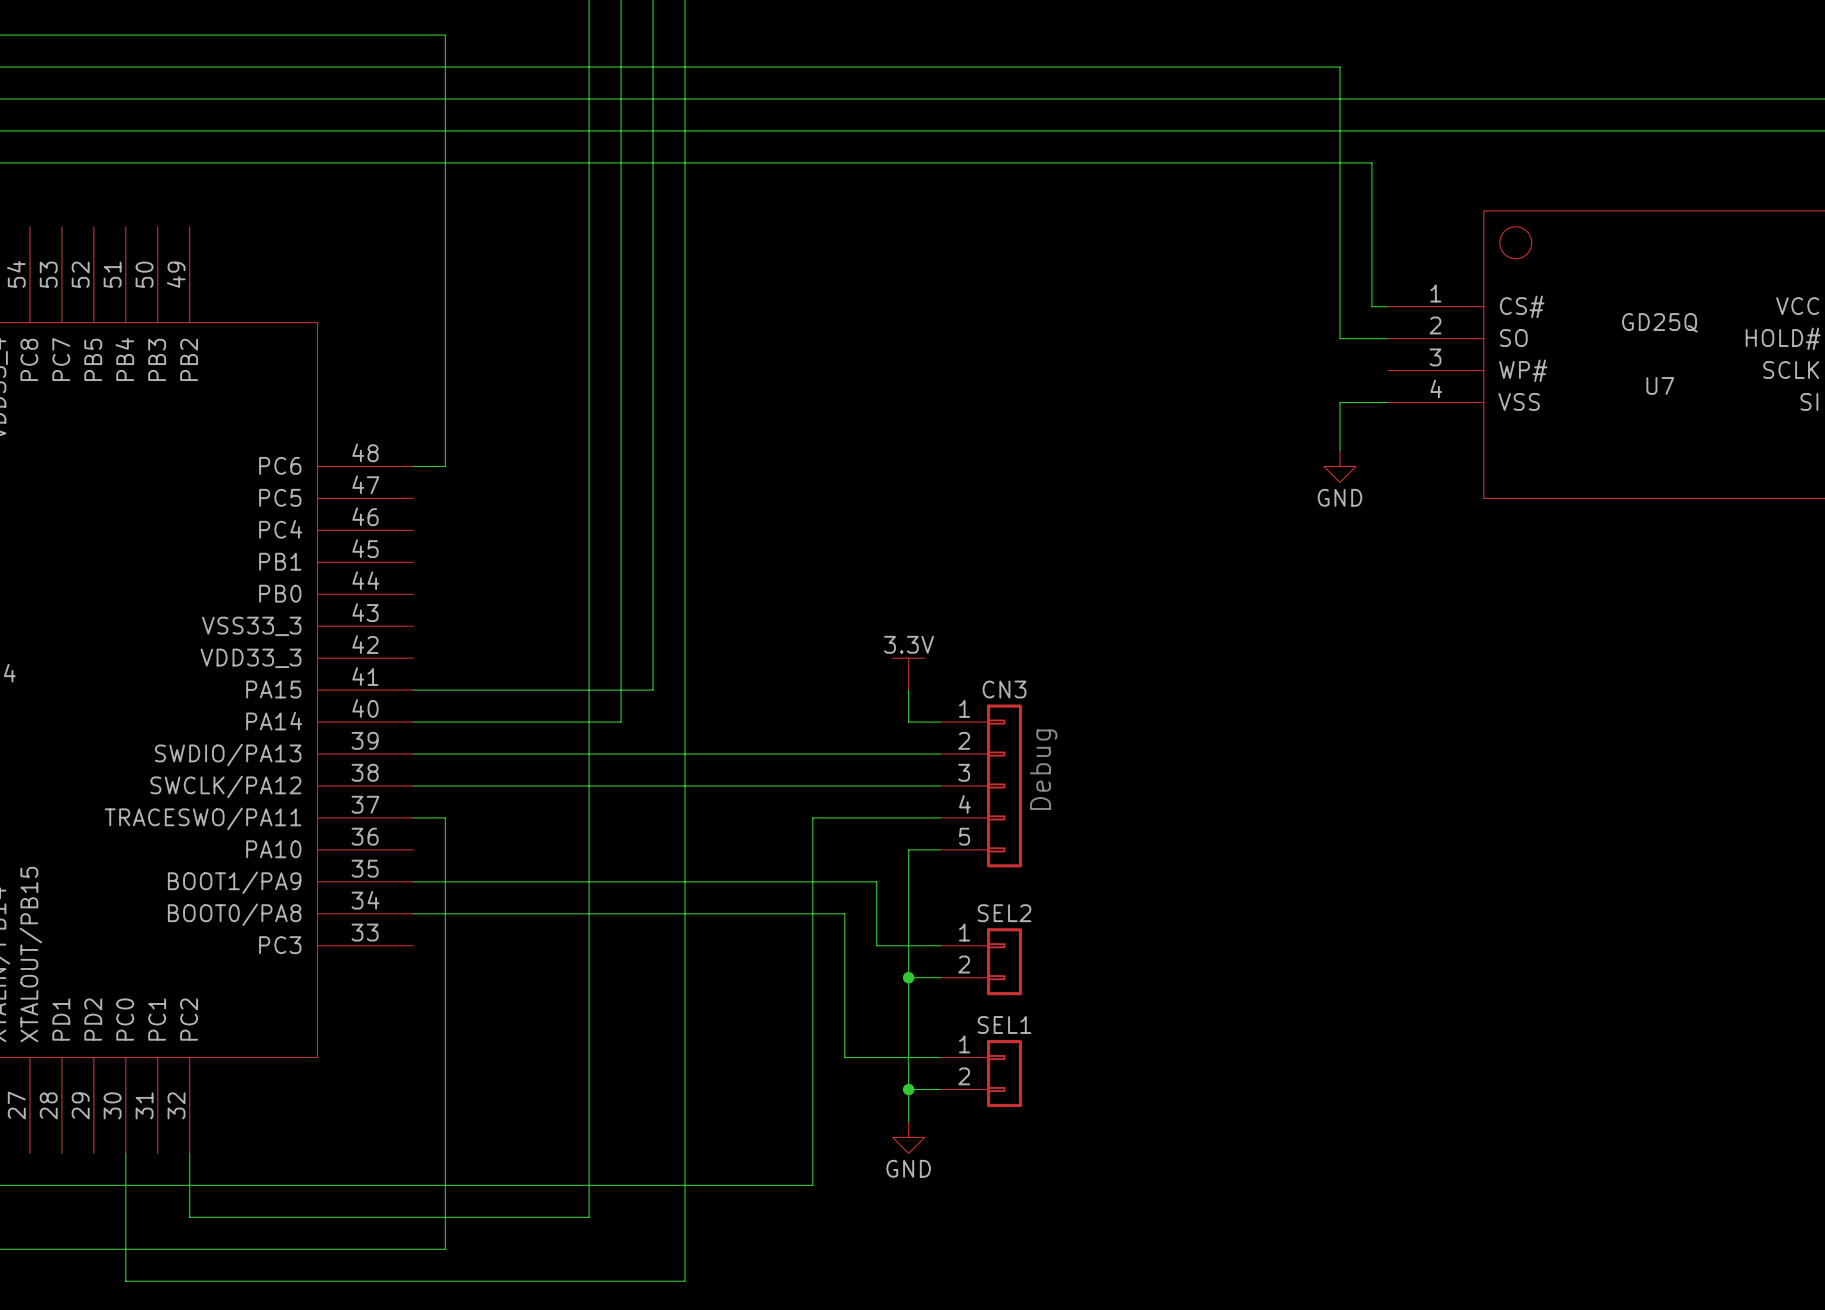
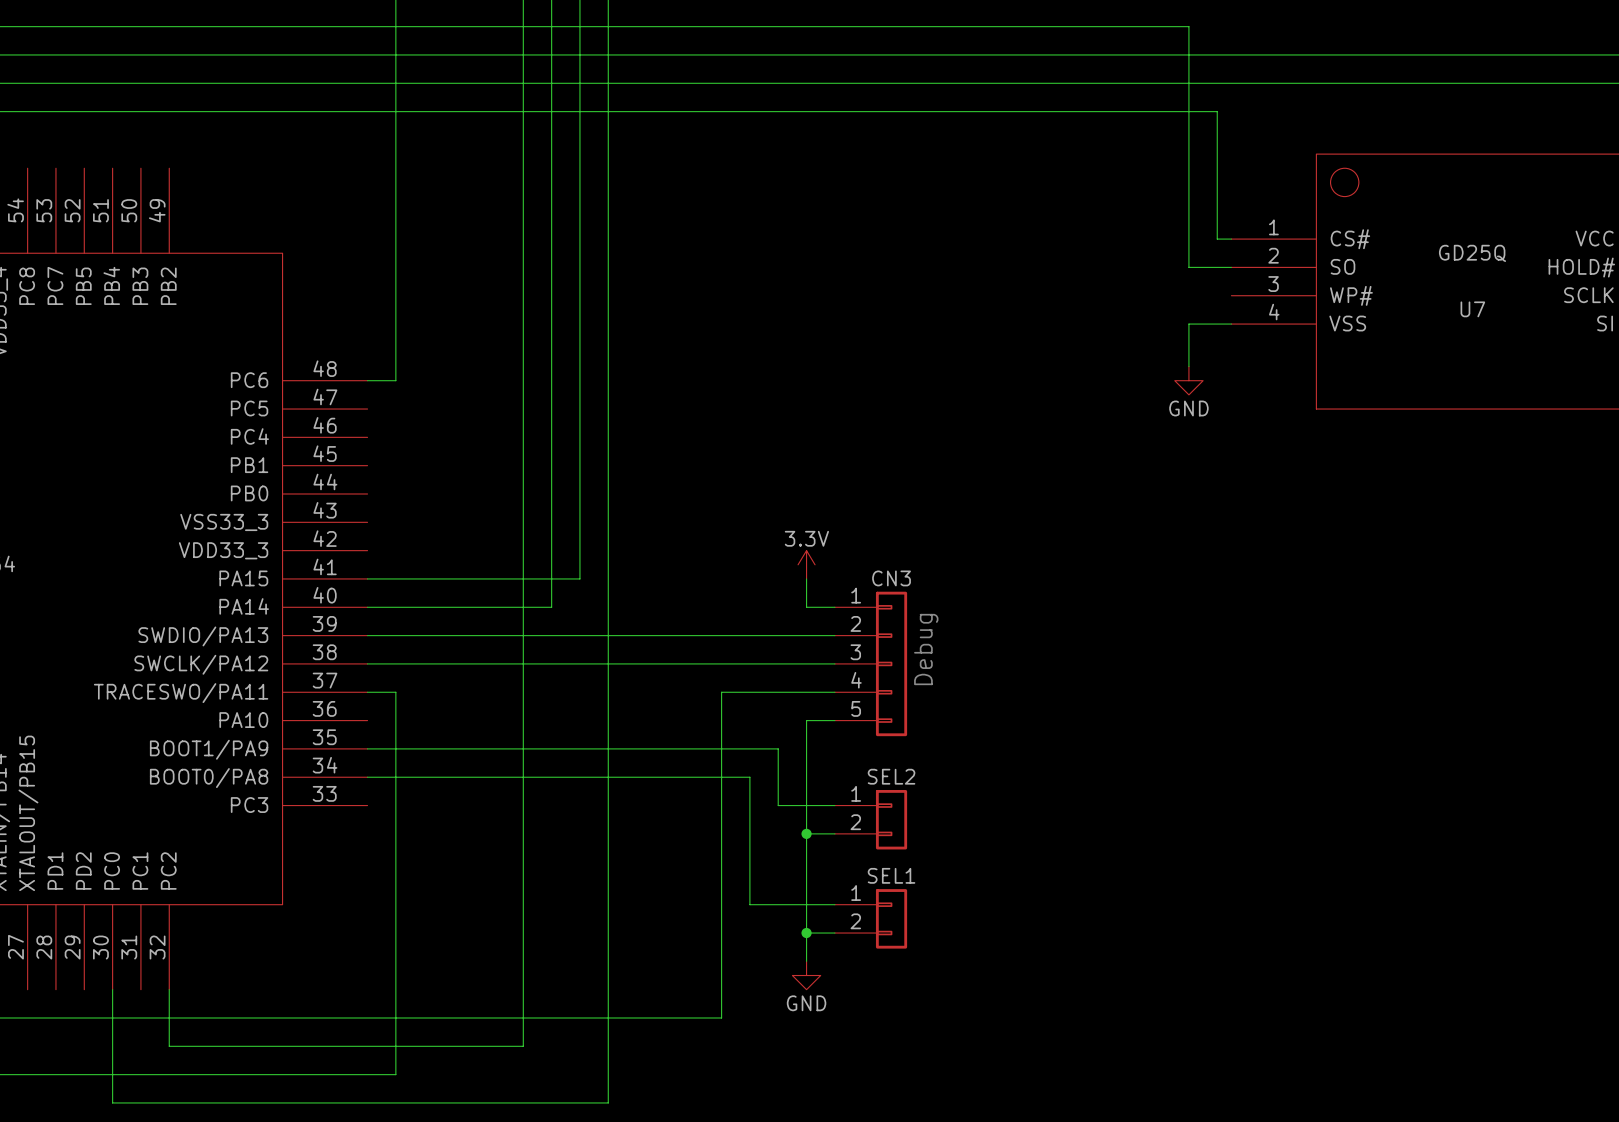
power symbol shape: [892, 658, 925, 691] -> [798, 550, 816, 579]

